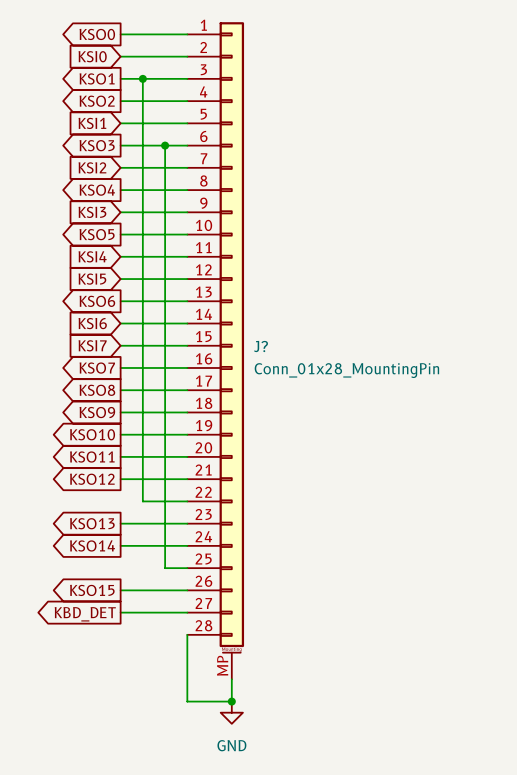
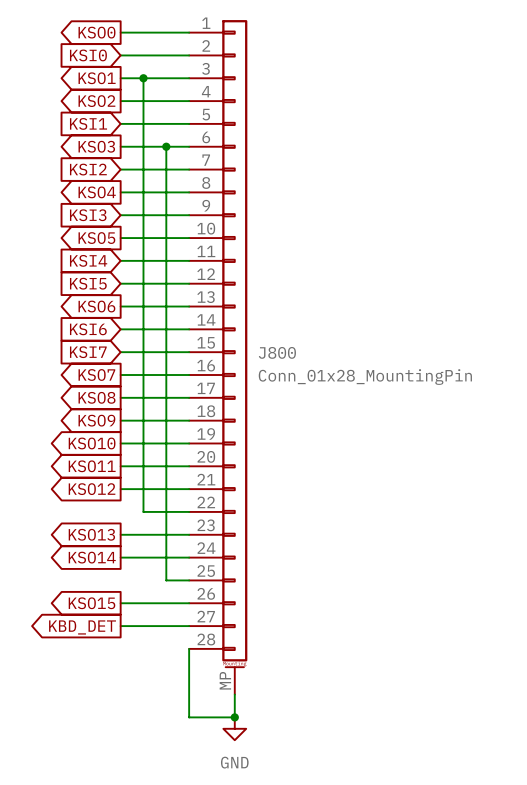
J? name: J? (261, 346) -> J800 (277, 352)

